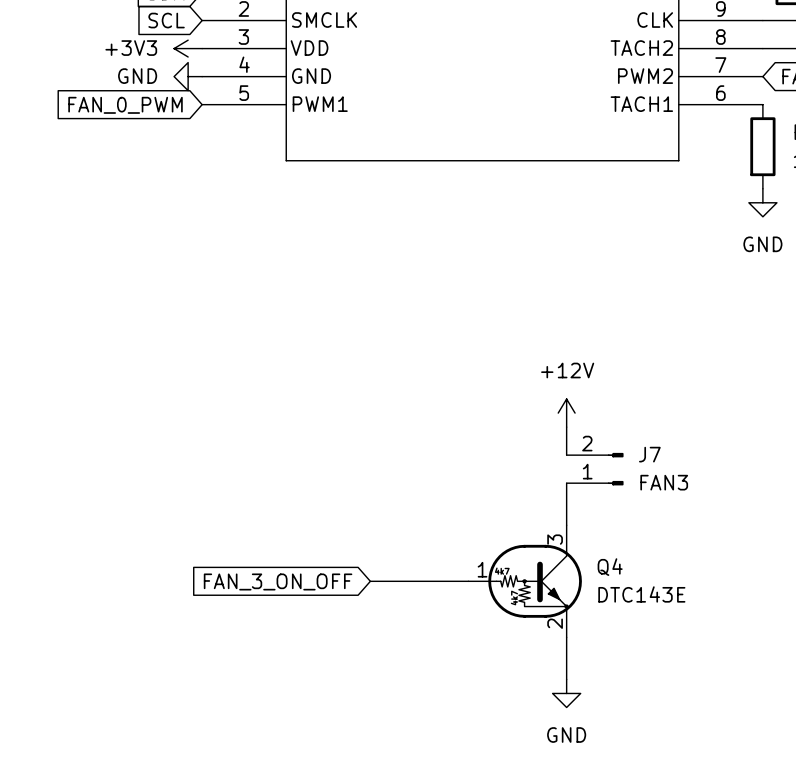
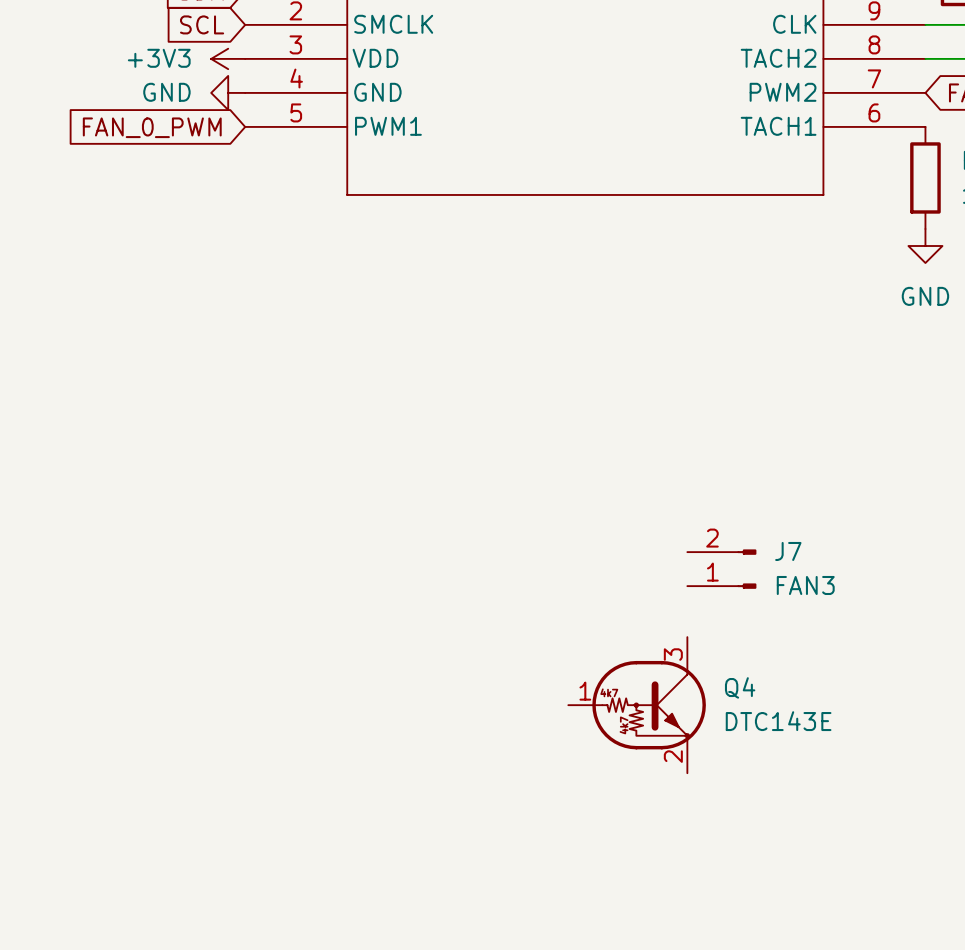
power symbol: +12V (566, 413) -> none
wire: (566, 427) (566, 455) -> none
wire: (566, 483) (566, 525) -> none
global label: FAN_3_ON_OFF (278, 581) -> none
wire: (370, 581) (468, 581) -> none
wire: (566, 637) (566, 679) -> none
power symbol: GND (566, 693) -> none

